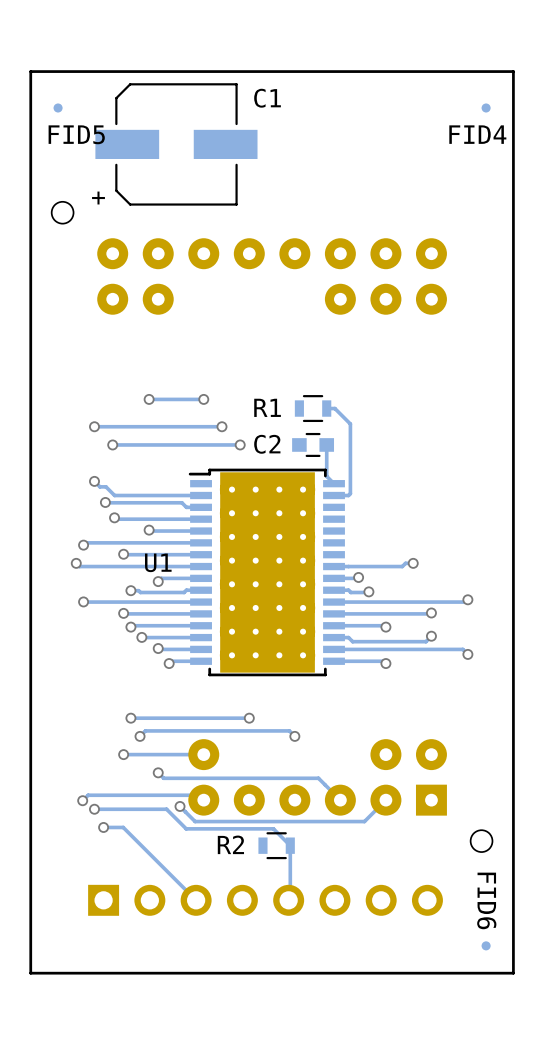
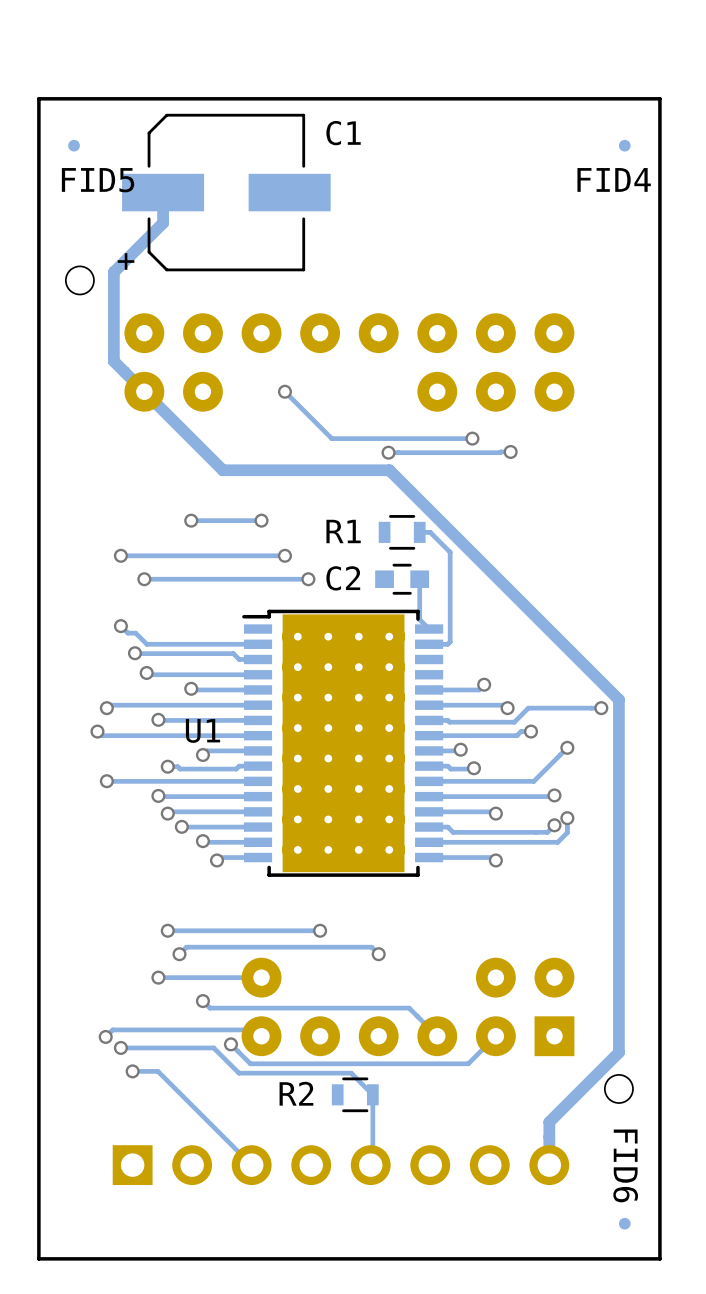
track: none -> (163, 192) (163, 223) (113, 272) (113, 361) (222, 470) (389, 470) (618, 699) (618, 1052) (549, 1122) (549, 1165)
track: none -> (284, 391) (331, 438) (472, 438)
via: none -> (284, 391)
via: none -> (472, 438)
via: none -> (388, 452)
track: none -> (510, 451) (388, 452)
via: none -> (510, 451)
track: none -> (484, 684) (478, 689) (429, 689)
via: none -> (484, 684)
track: none -> (429, 705) (504, 705) (507, 708)
via: none -> (507, 708)
track: none -> (601, 708) (528, 708) (514, 722) (429, 720)
via: none -> (601, 708)
via: none -> (567, 747)
track: (467, 599) (465, 602) (415, 602) -> (567, 747) (533, 781)
via: (467, 599) -> none
via: none -> (567, 818)
track: (434, 649) (462, 649) (467, 654) -> (557, 842) (567, 832) (567, 818)
via: (467, 654) -> none

